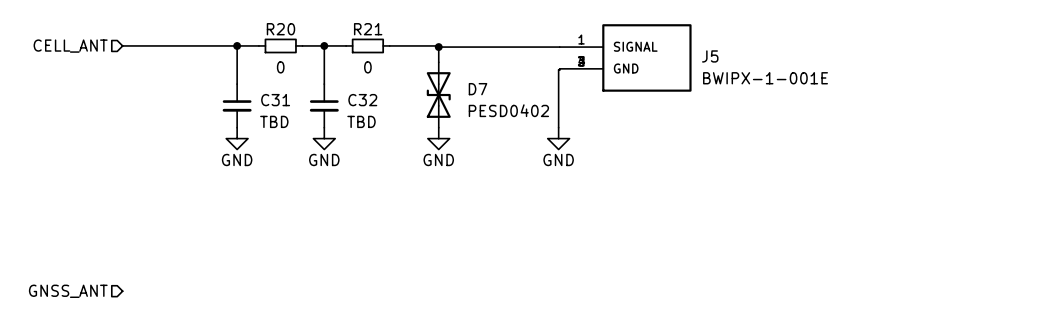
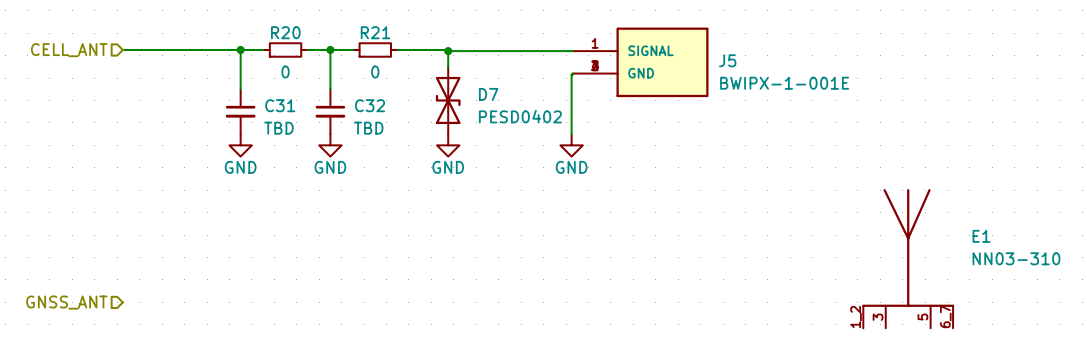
E1: none -> NN03-310 (908, 258)

